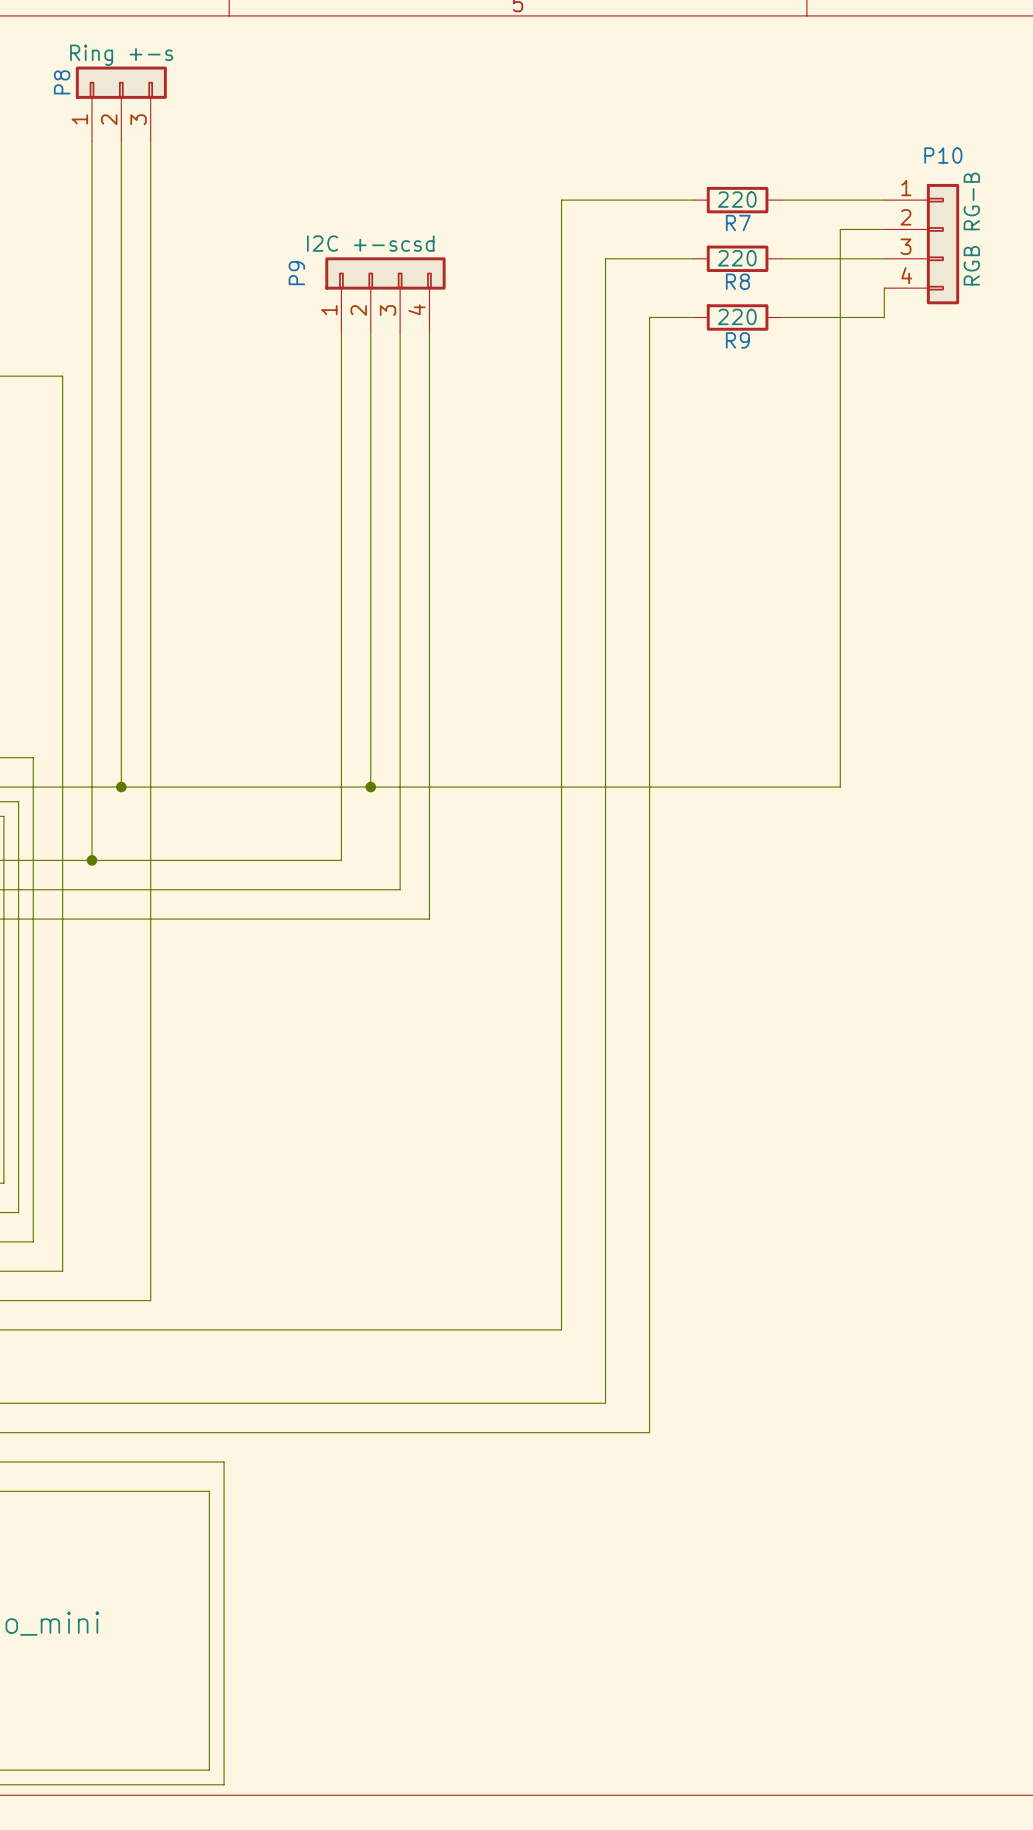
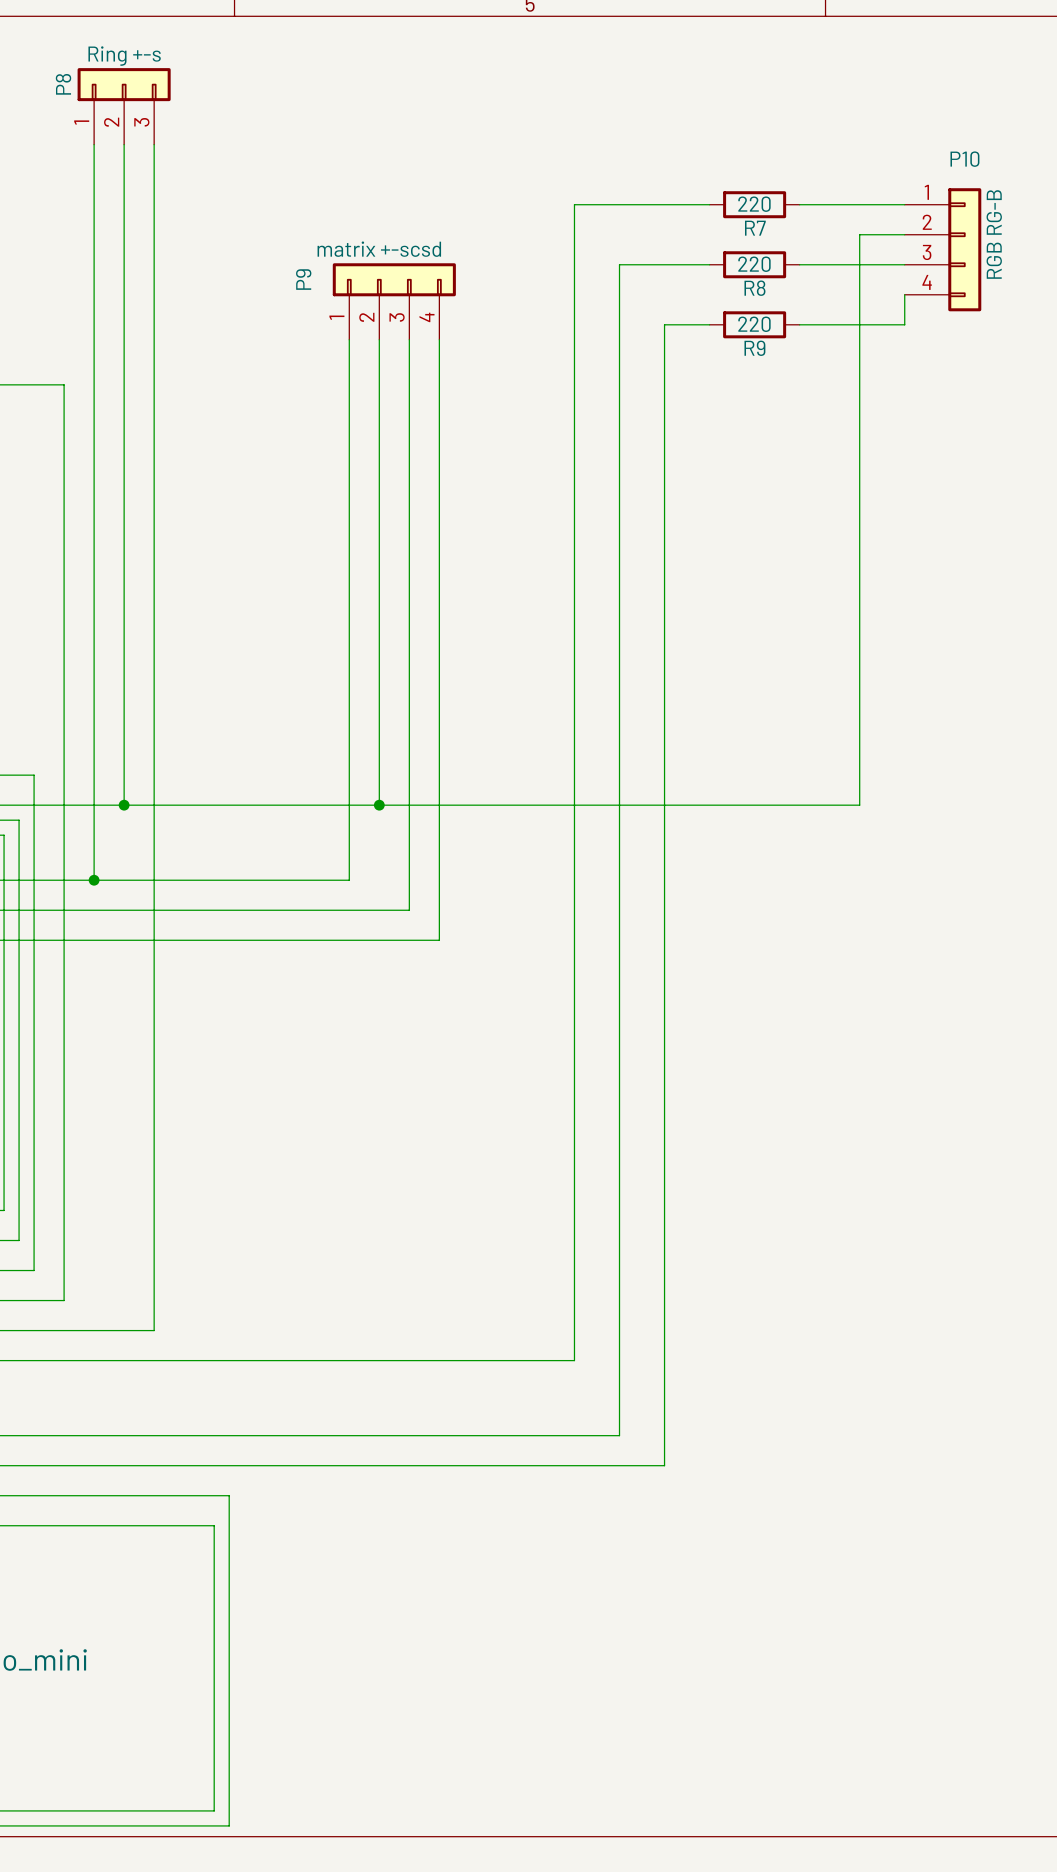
P9 value: I2C +-scsd (370, 243) -> matrix +-scsd (379, 249)

